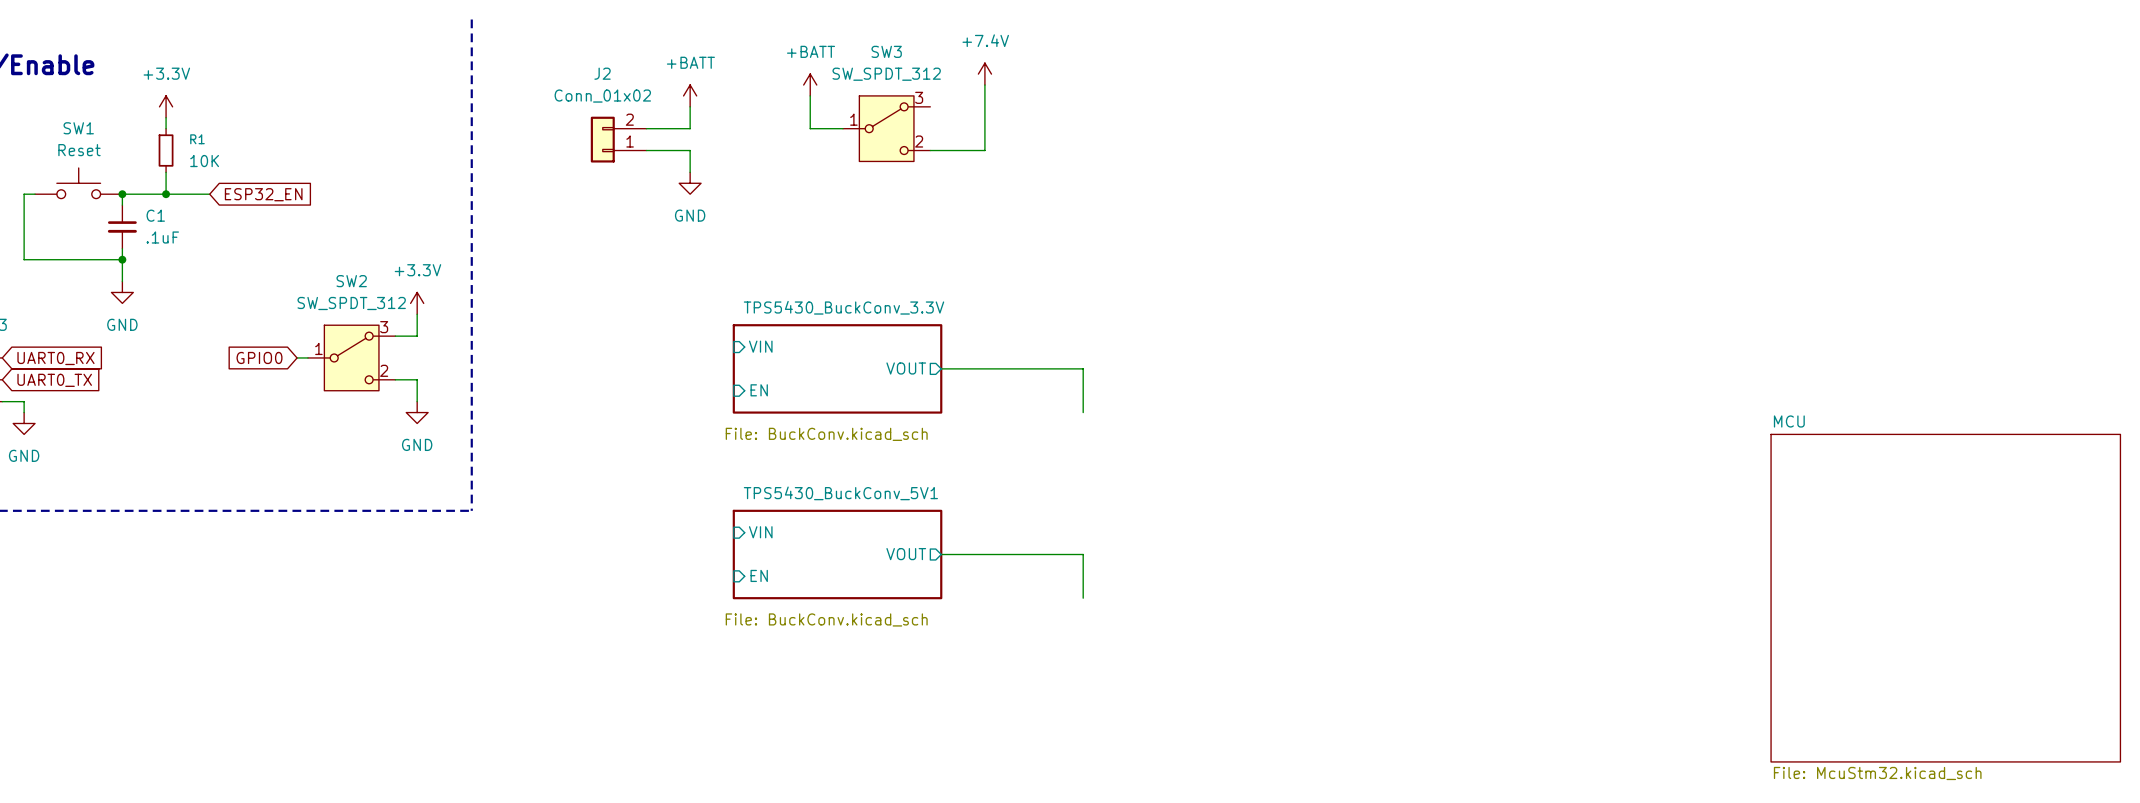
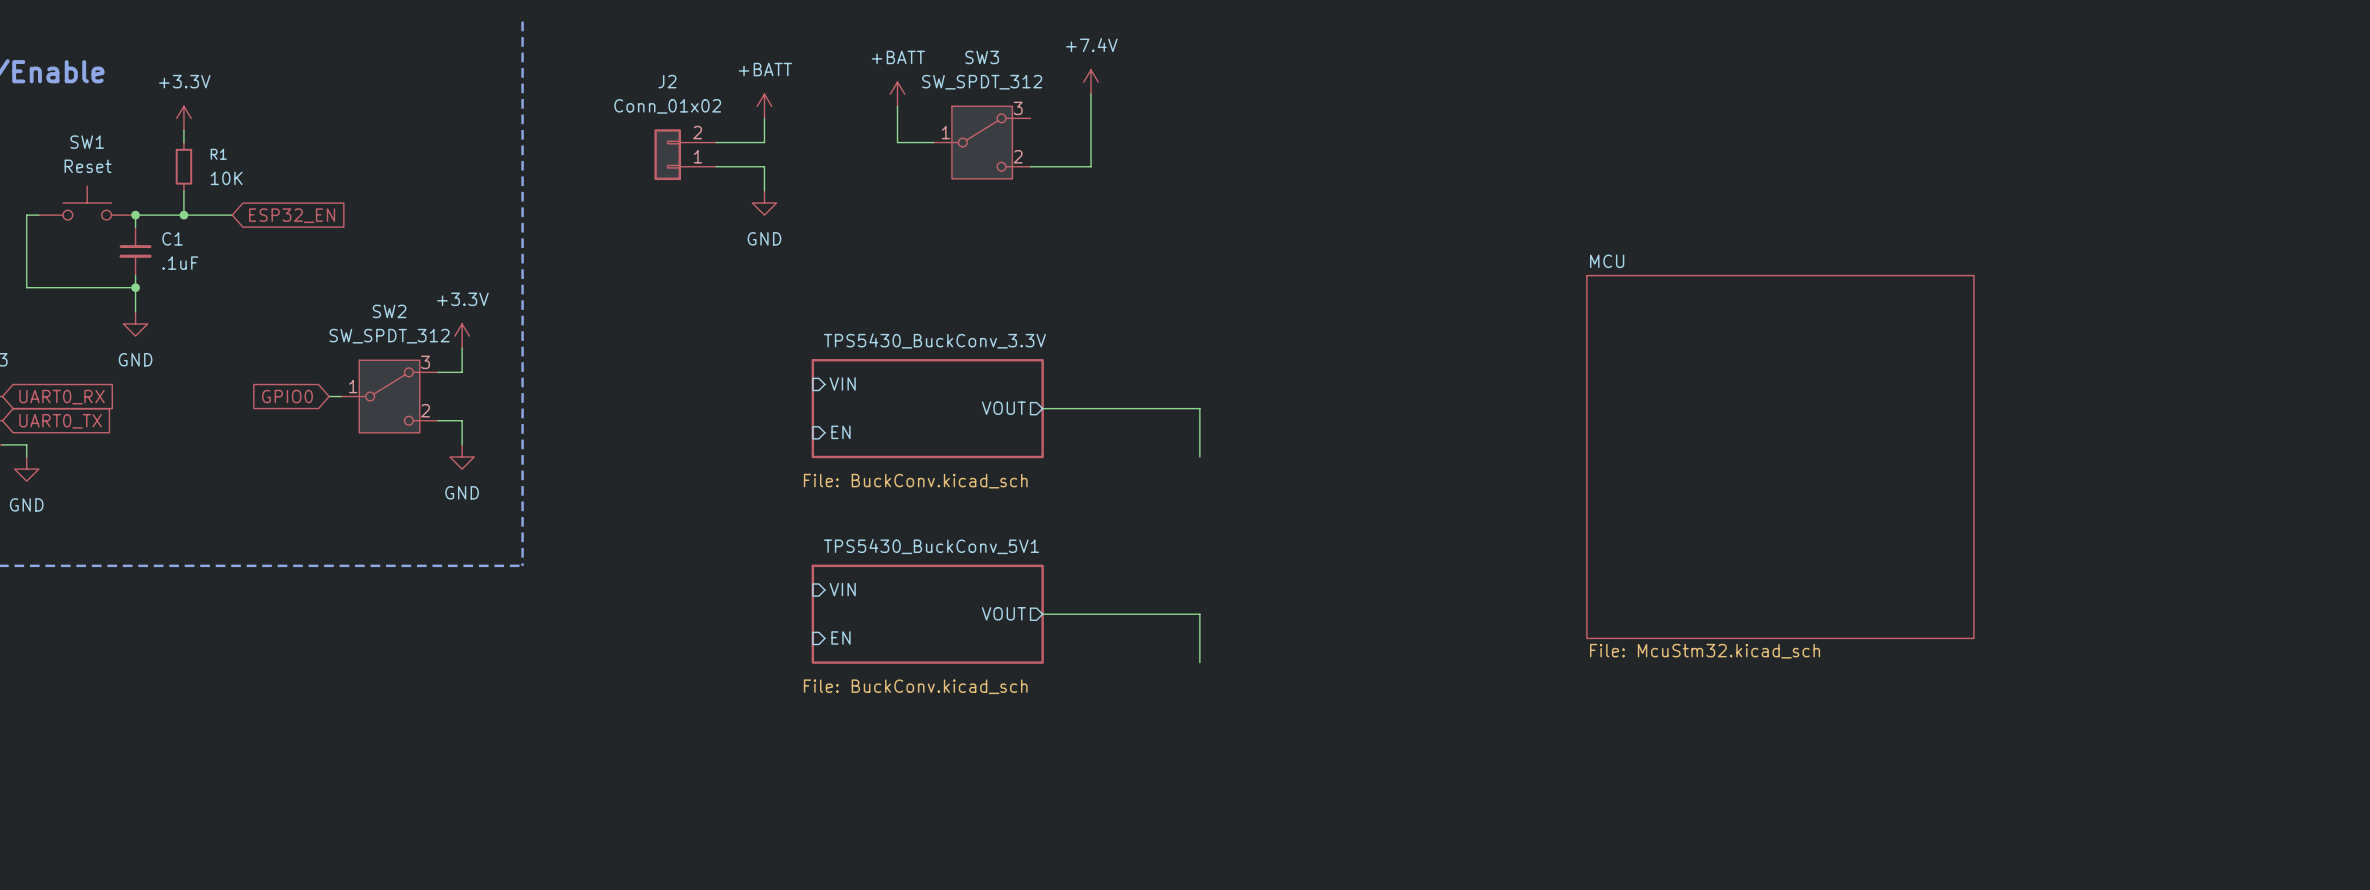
sheet MCU: none -> File: McuStm32.kicad_sch (1780, 457)
sheet MCU: File: McuStm32.kicad_sch (1945, 598) -> none

